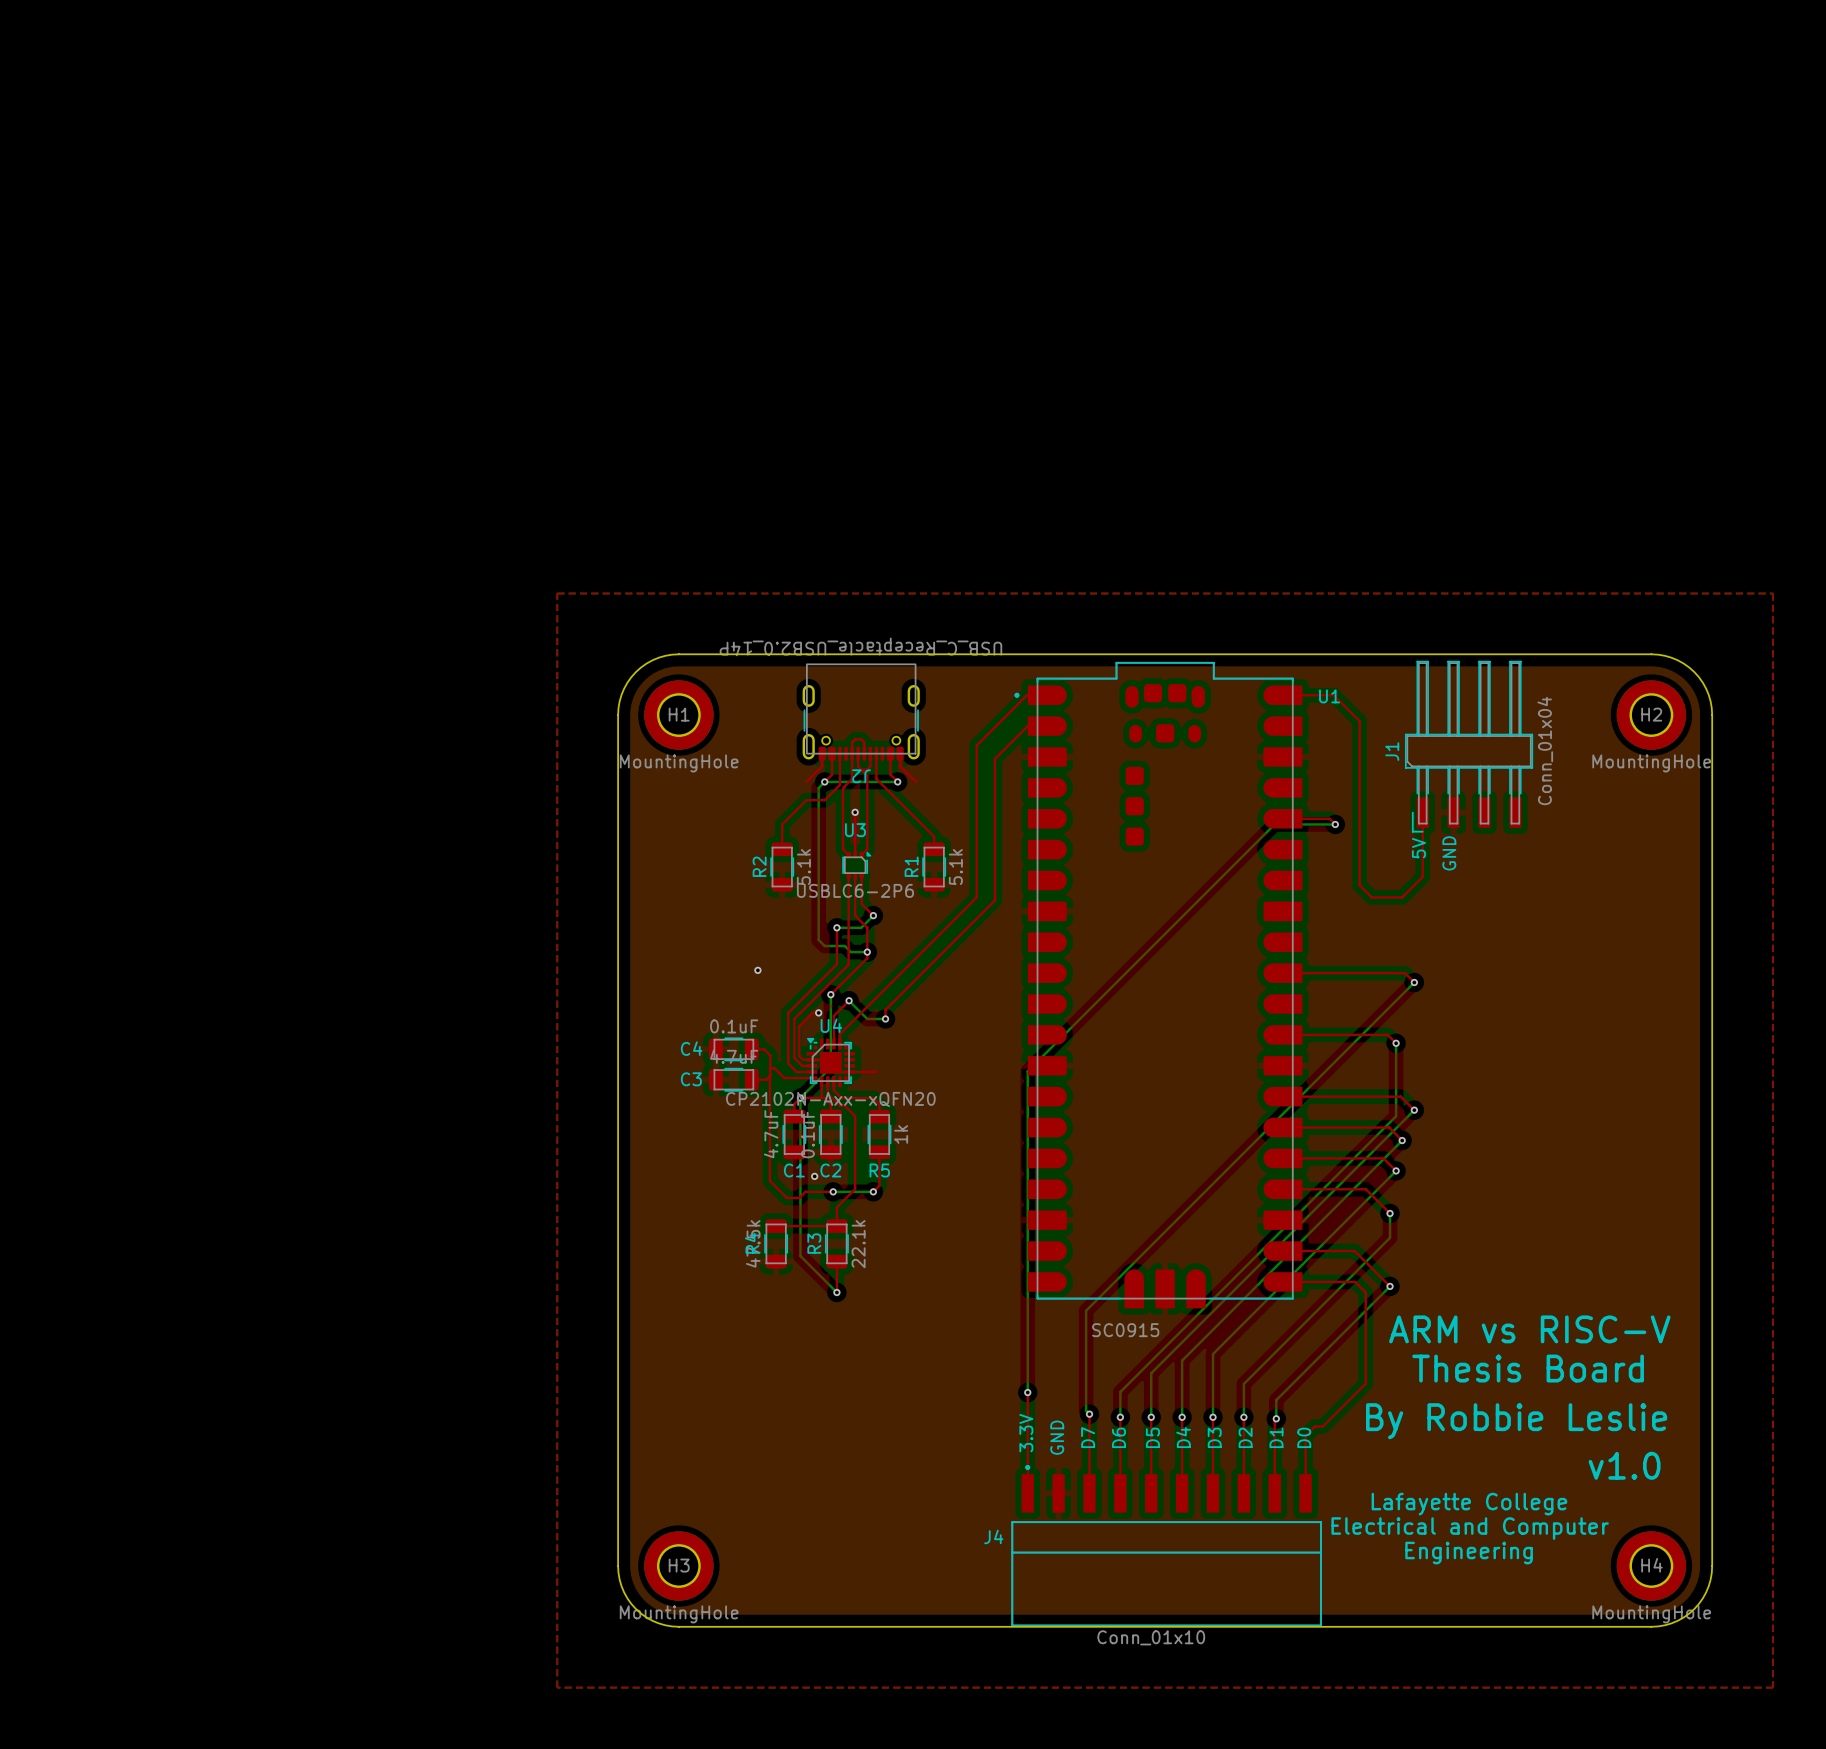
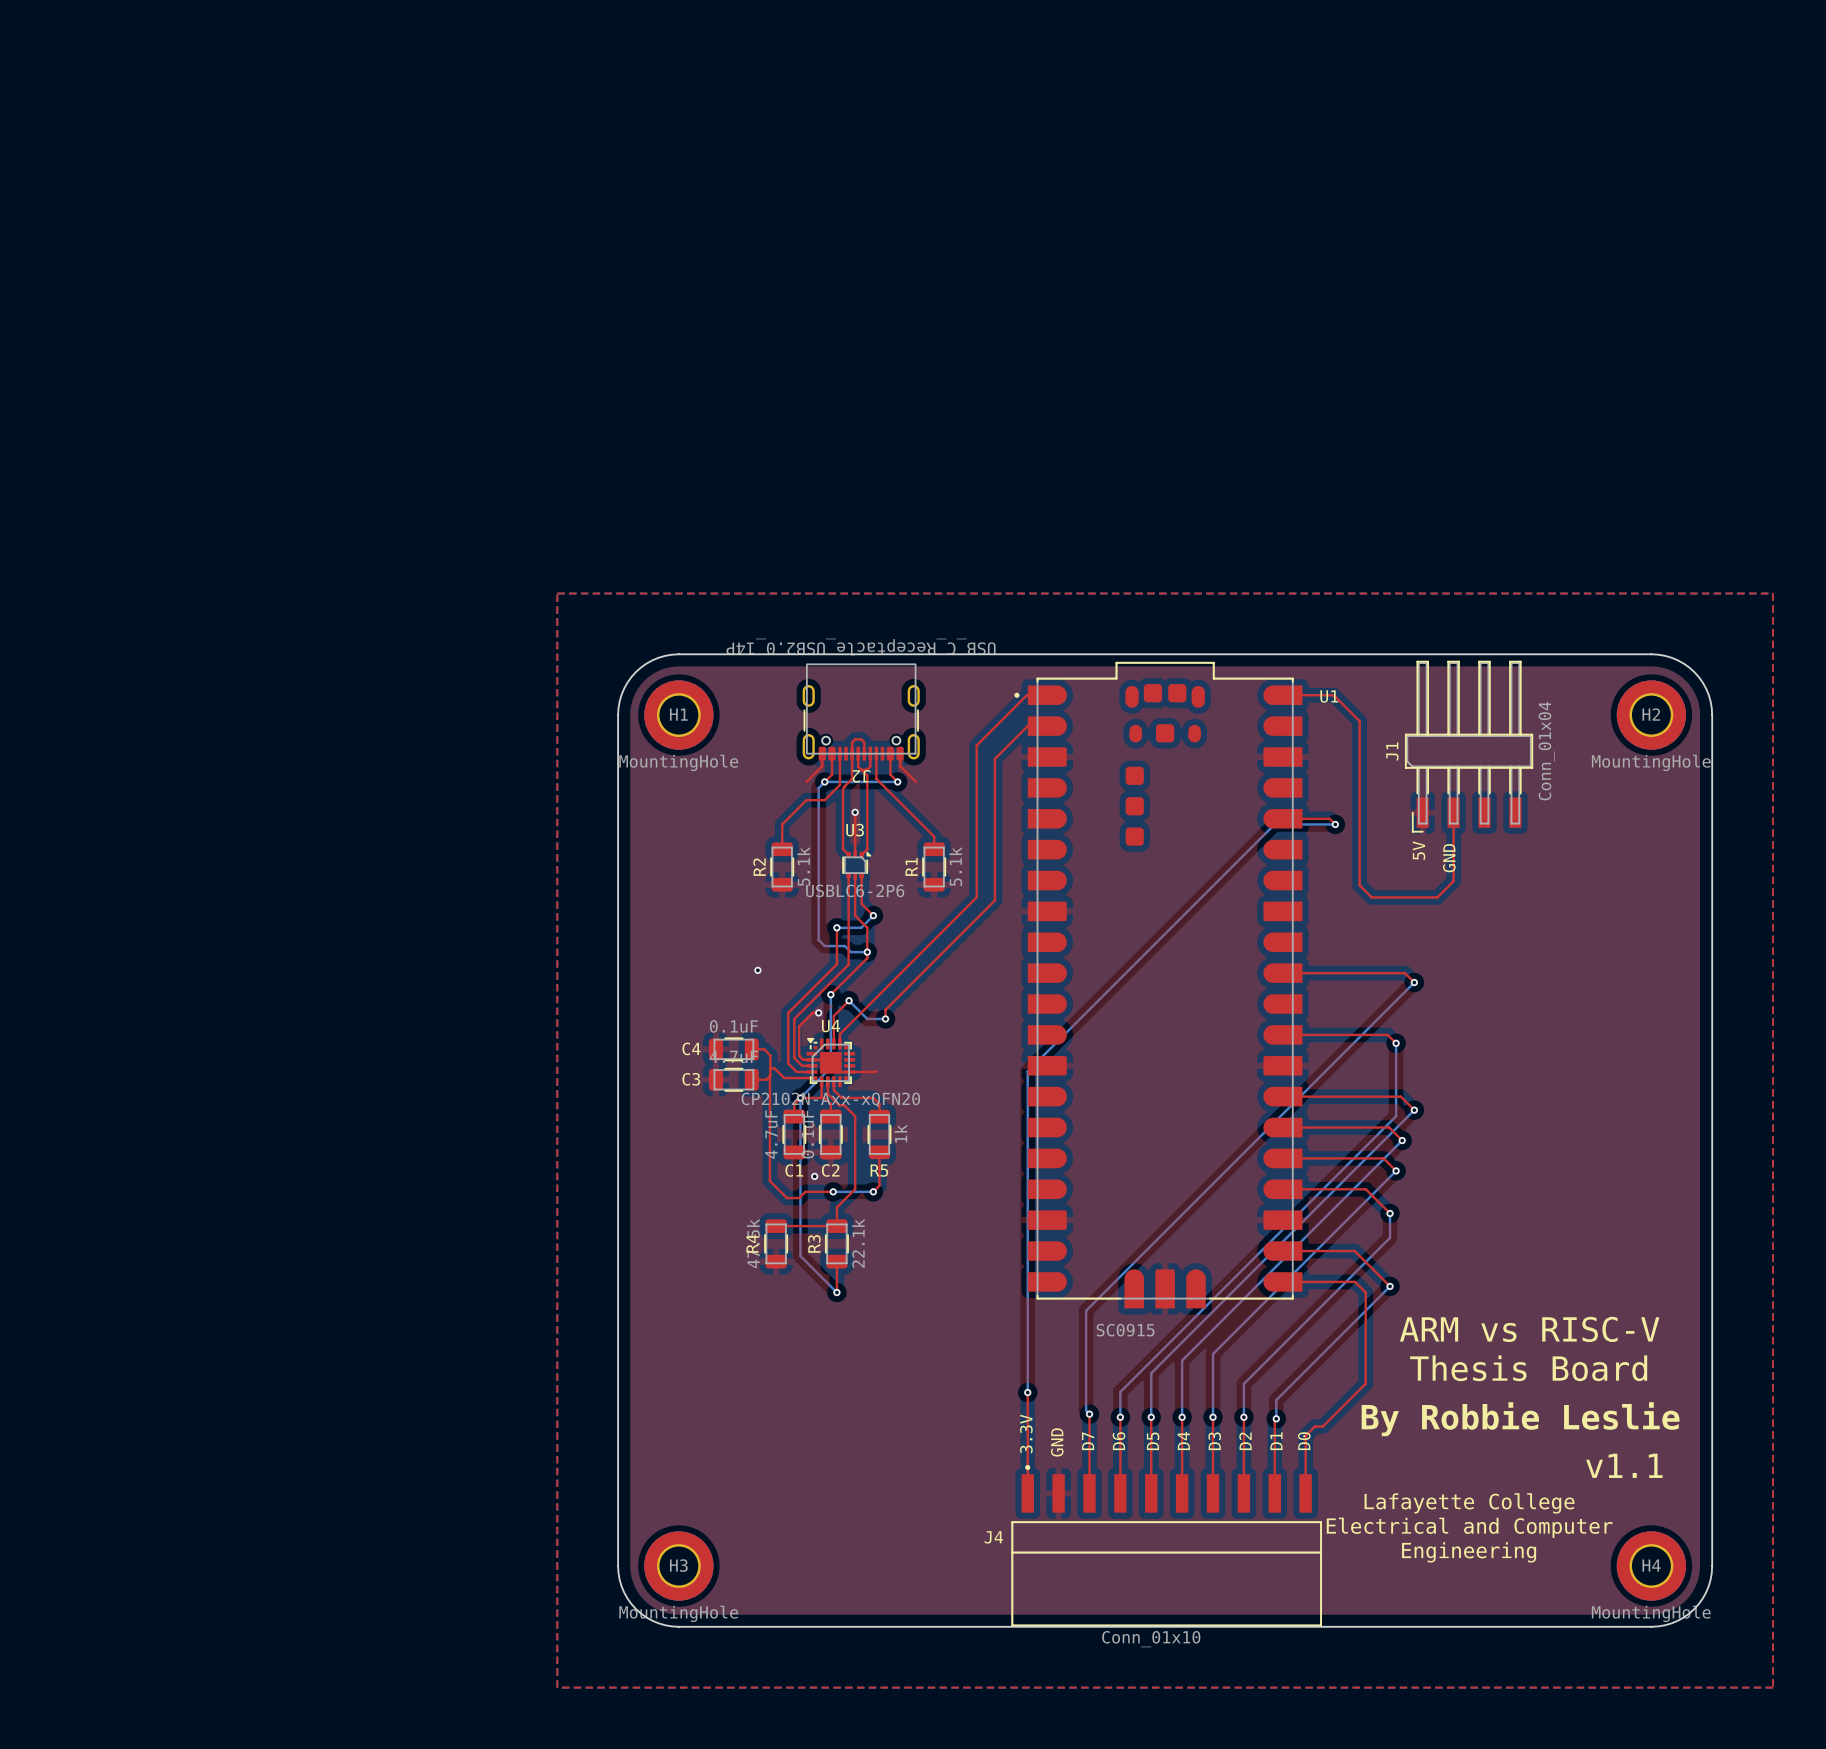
top track: (1422, 812) (1422, 876) (1402, 897) -> (1453, 812) (1453, 881) (1437, 897) (1402, 897)
text: v1.0 (1624, 1465) -> v1.1 (1624, 1465)

